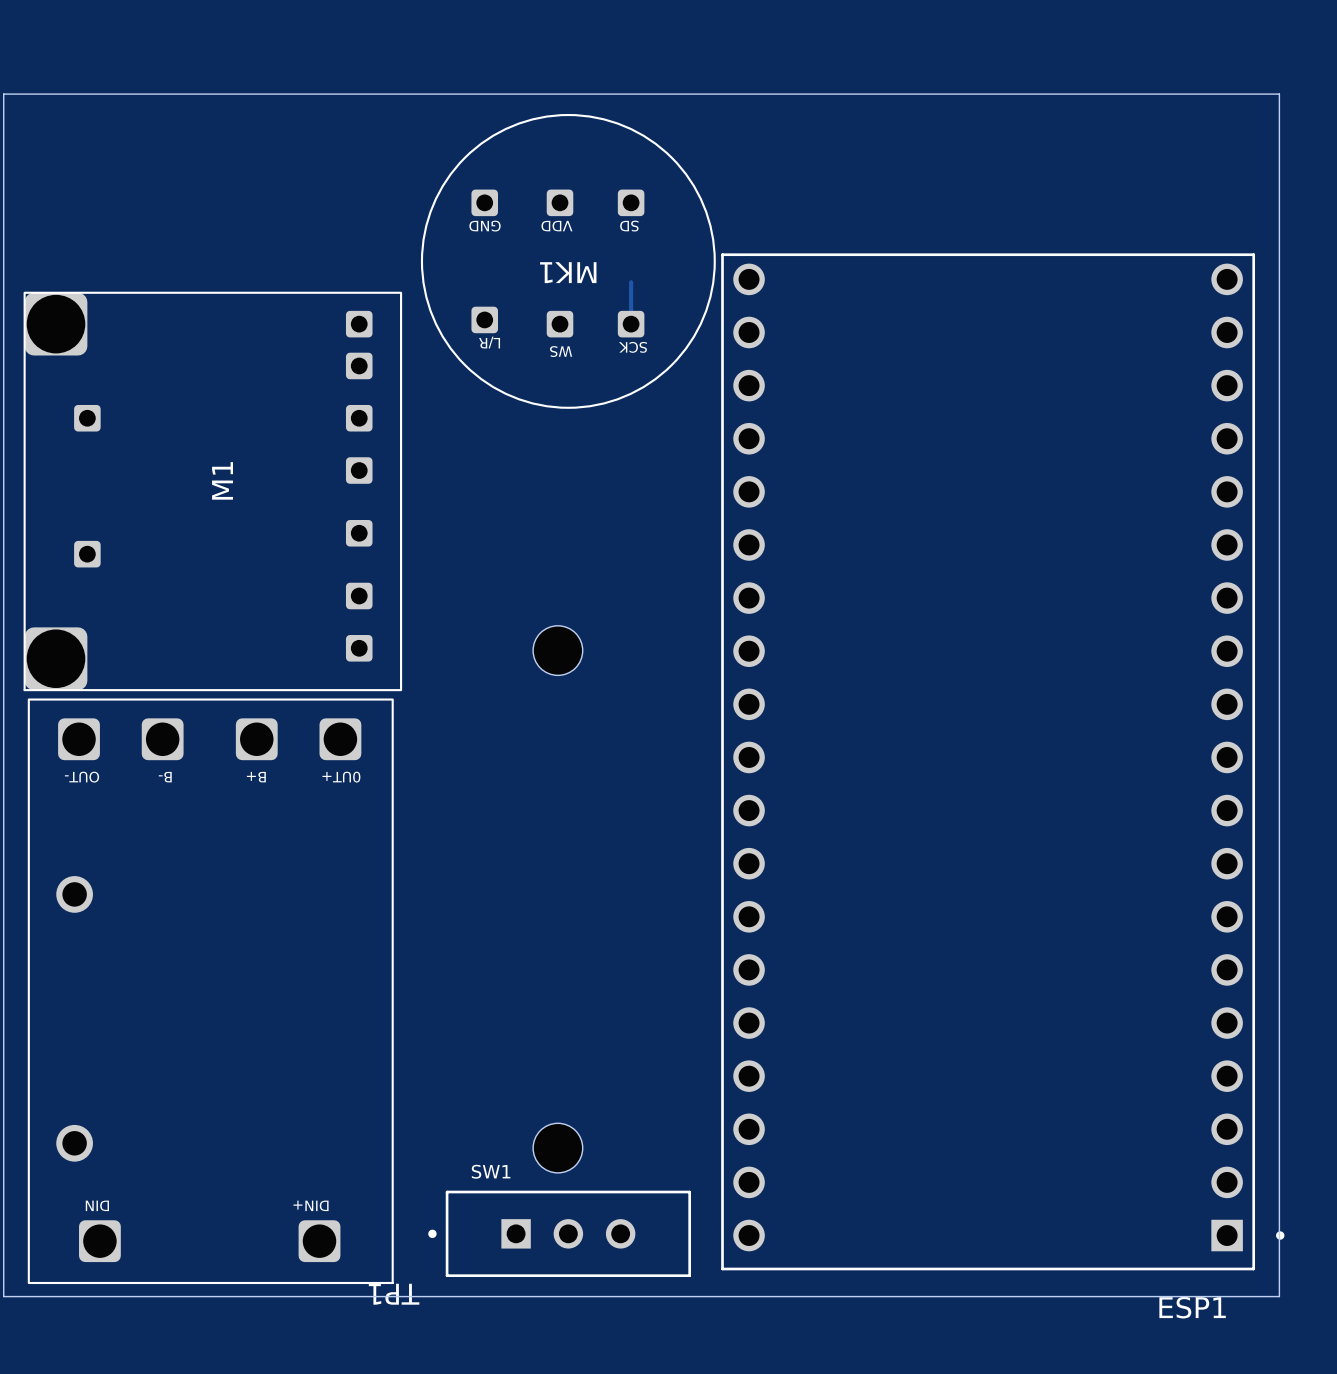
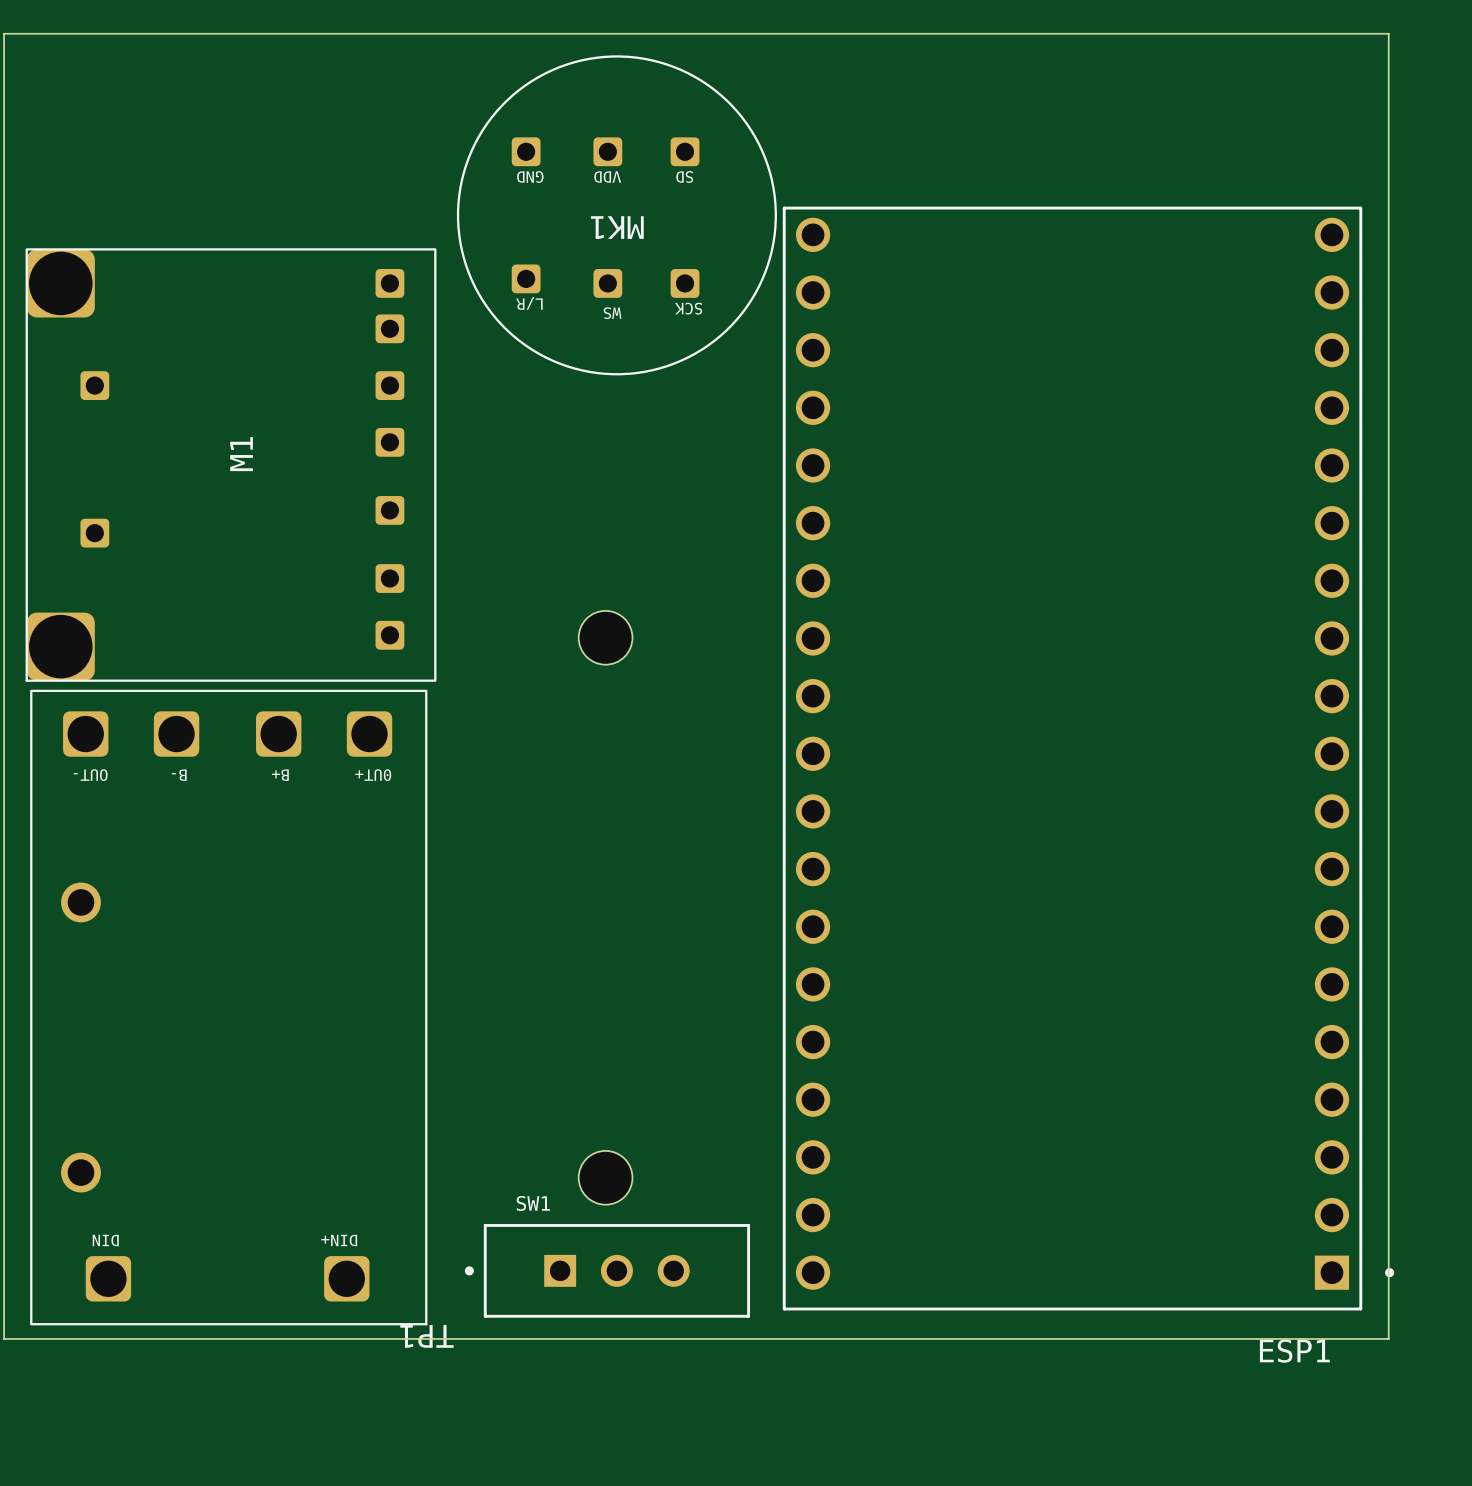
track: (631, 282) (631, 324) -> none

